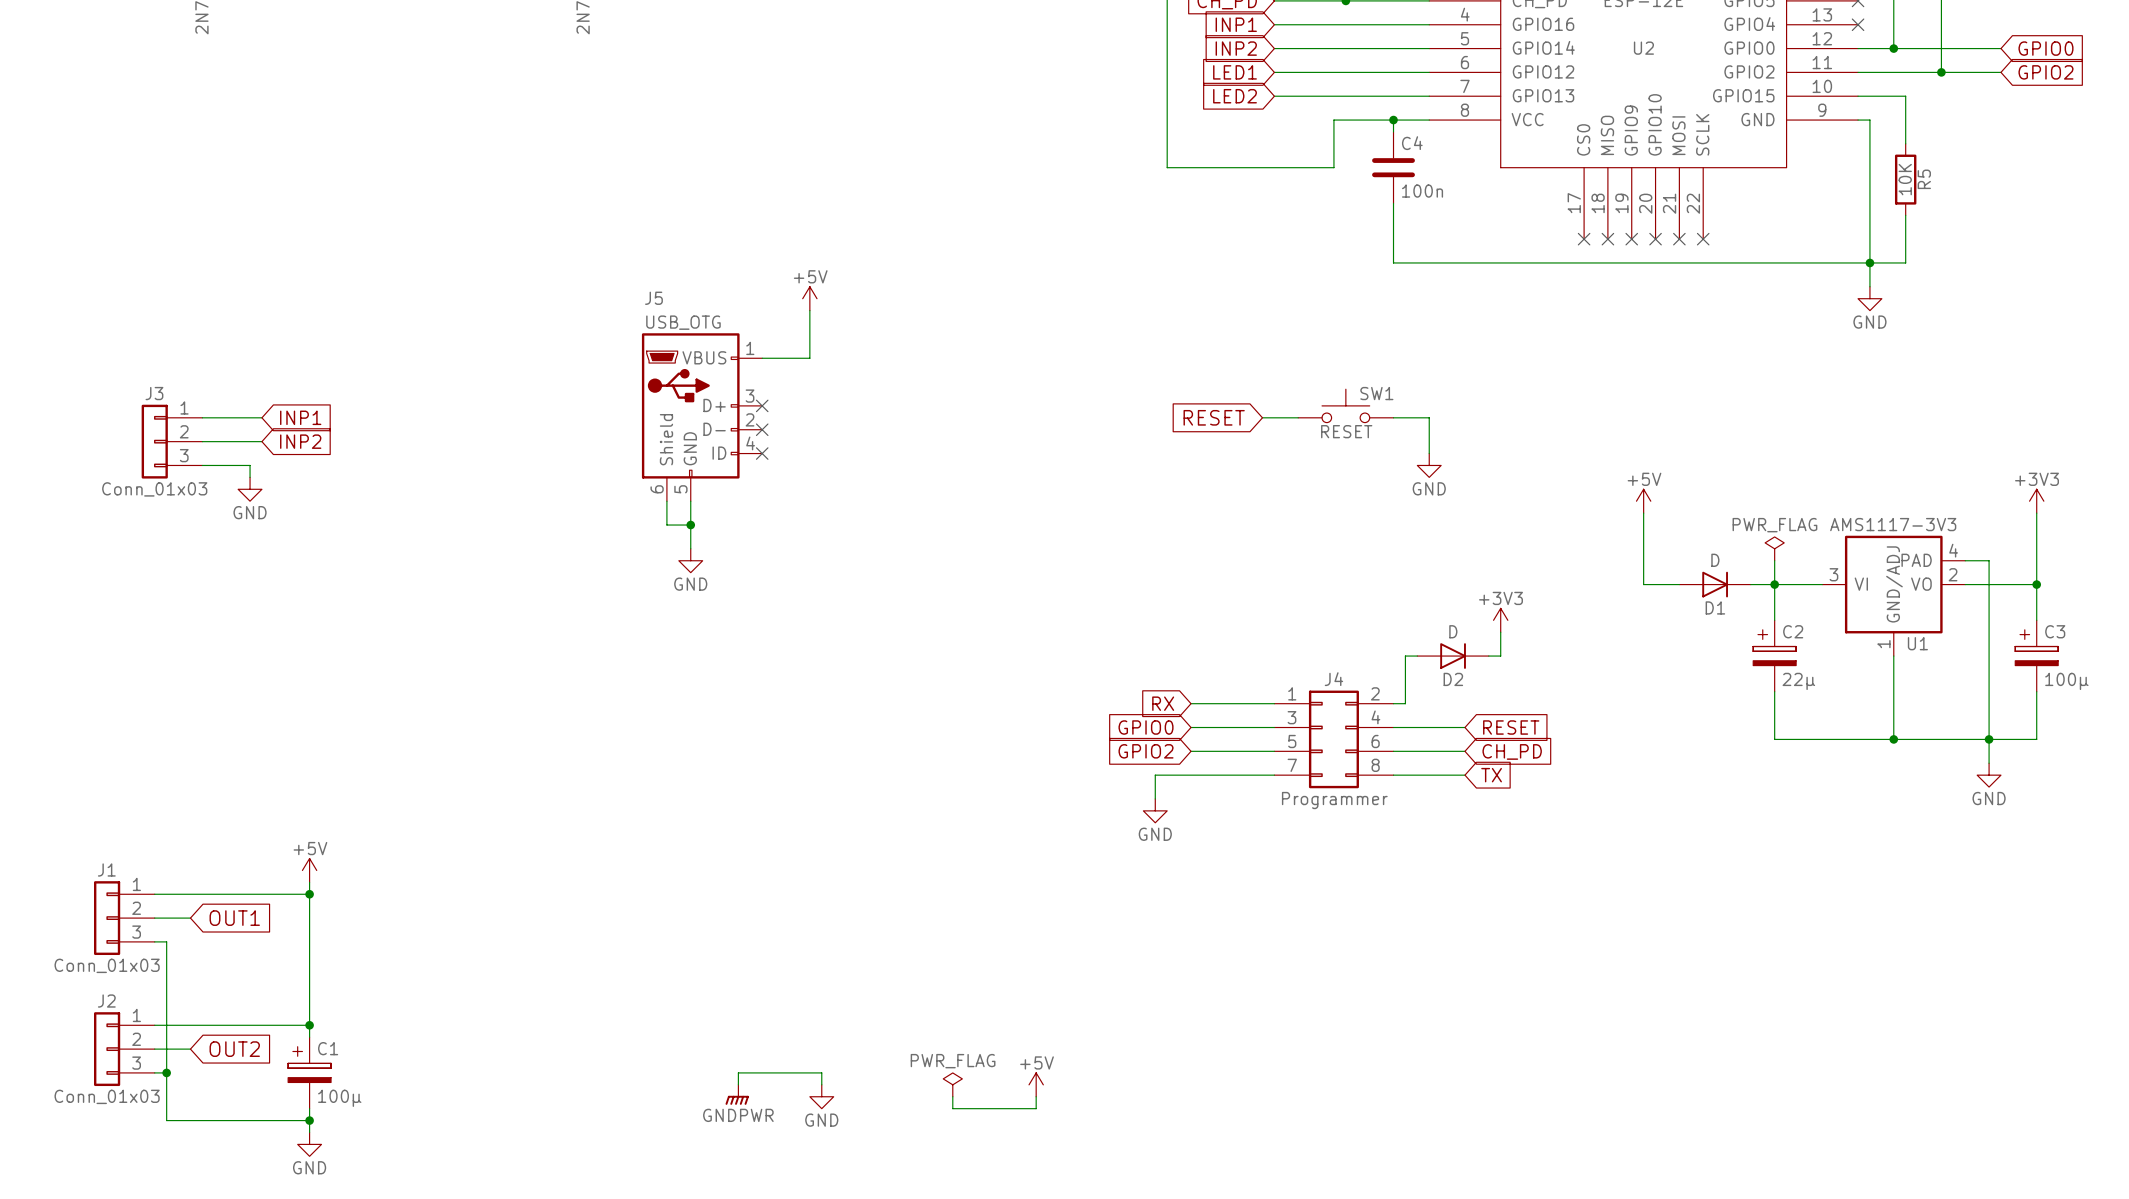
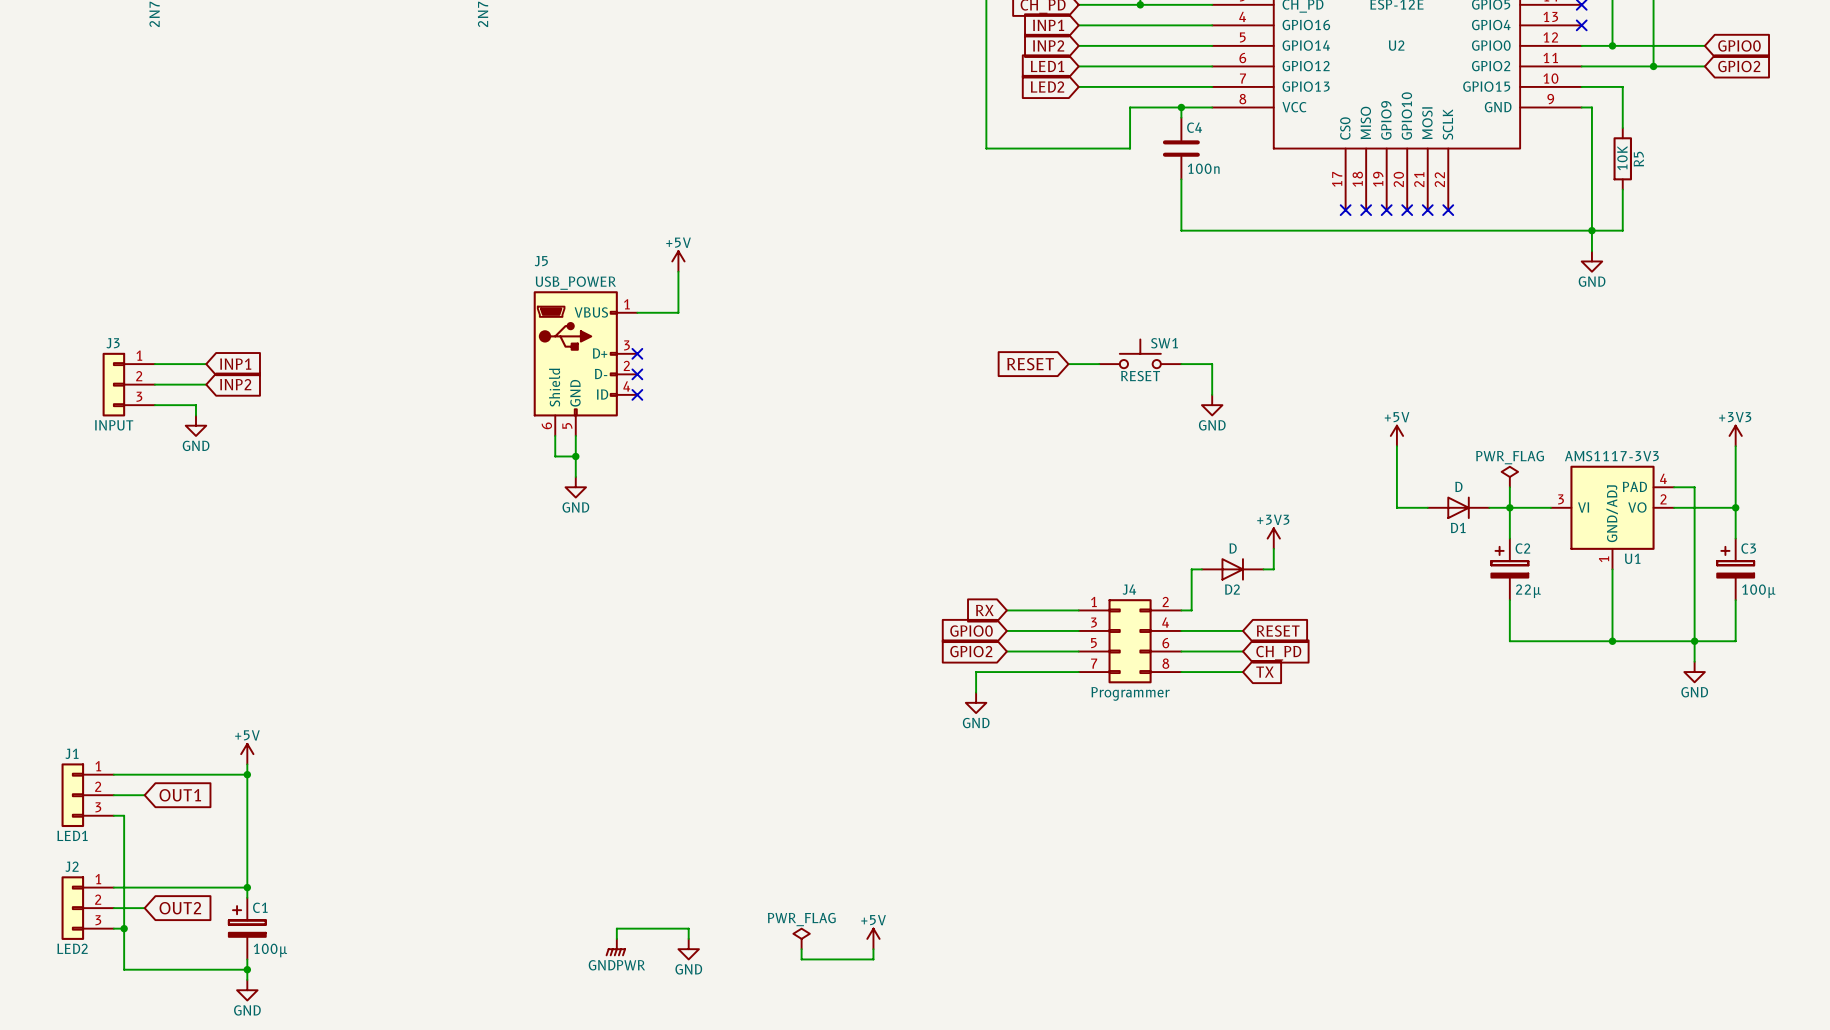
J5 value: USB_OTG (683, 322) -> USB_POWER (575, 283)
J3 value: Conn_01x03 (154, 489) -> INPUT (114, 425)
J1 value: Conn_01x03 (107, 965) -> LED1 (72, 835)
J2 value: Conn_01x03 (107, 1096) -> LED2 (72, 948)

